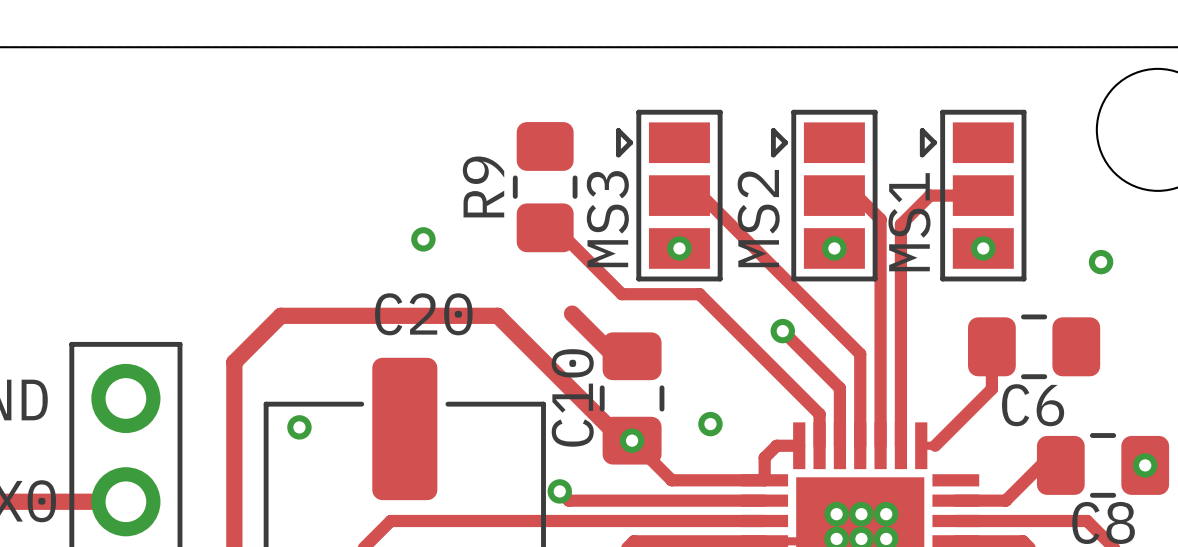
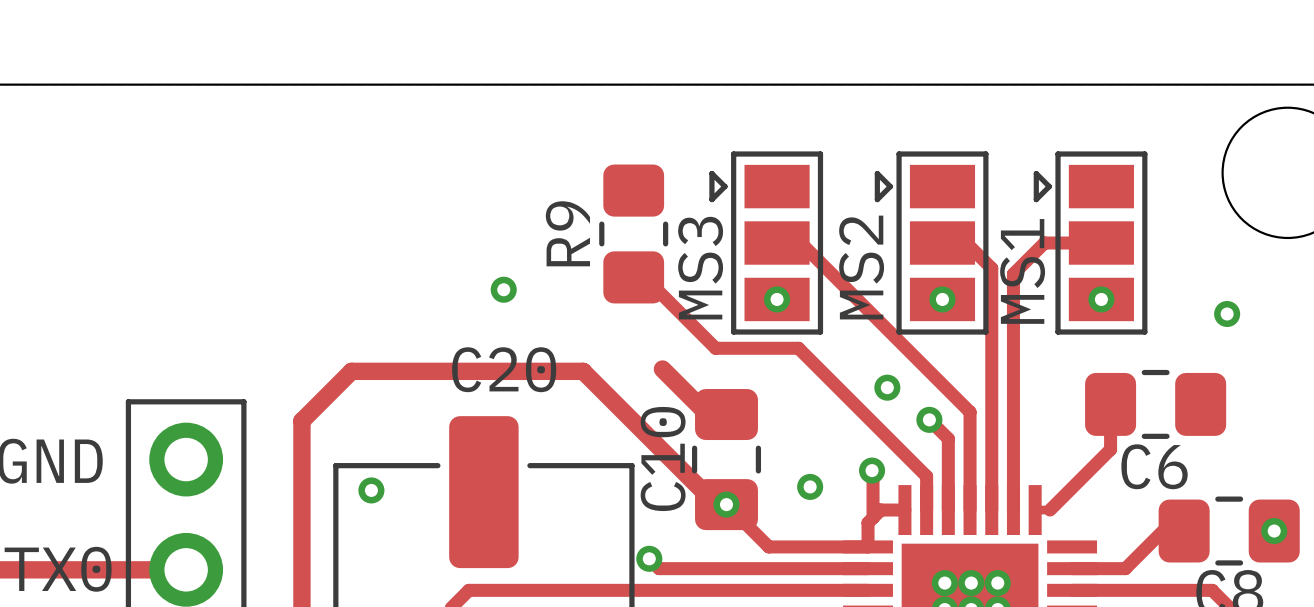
track: (782, 331) (839, 388) -> (929, 419) (948, 438) (948, 448)
via: none -> (929, 419)
track: none -> (872, 470) (873, 517)
via: none -> (872, 470)

